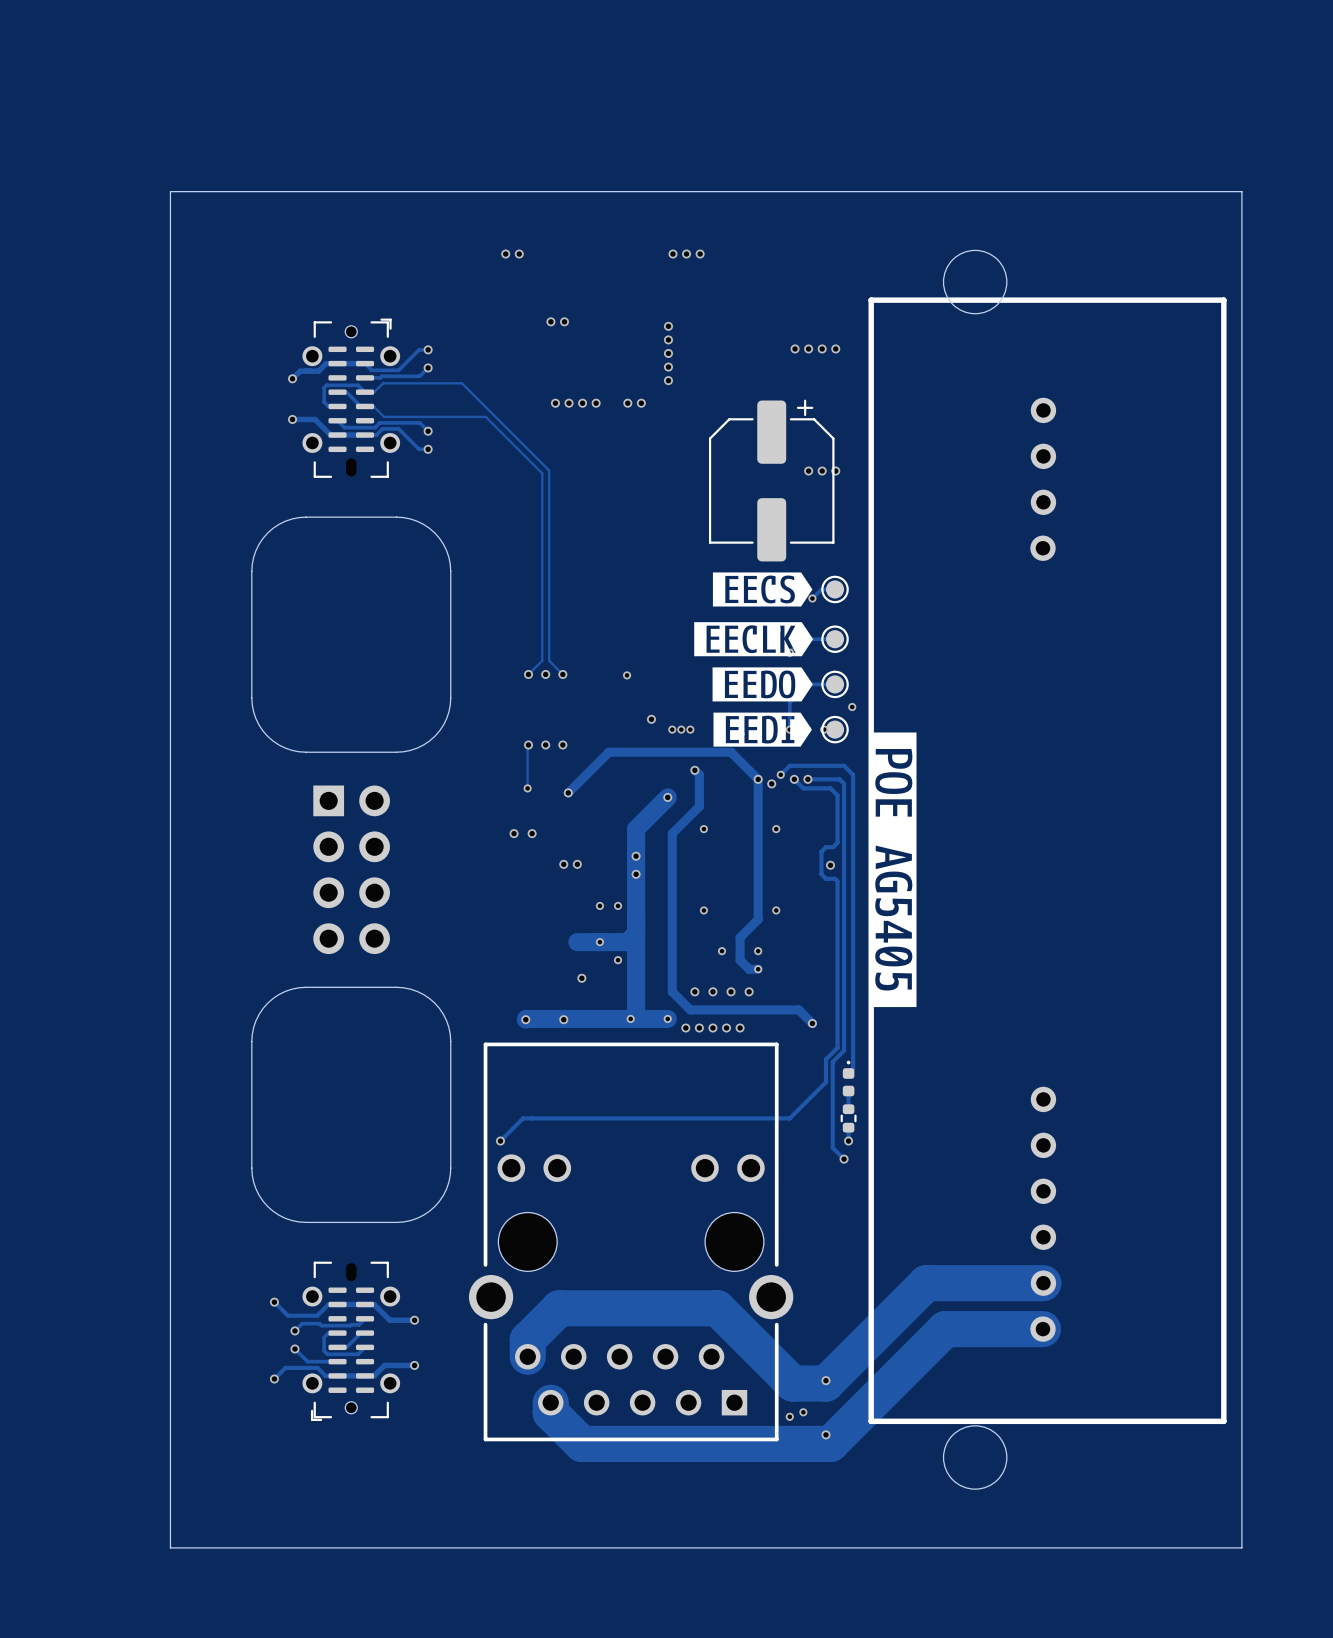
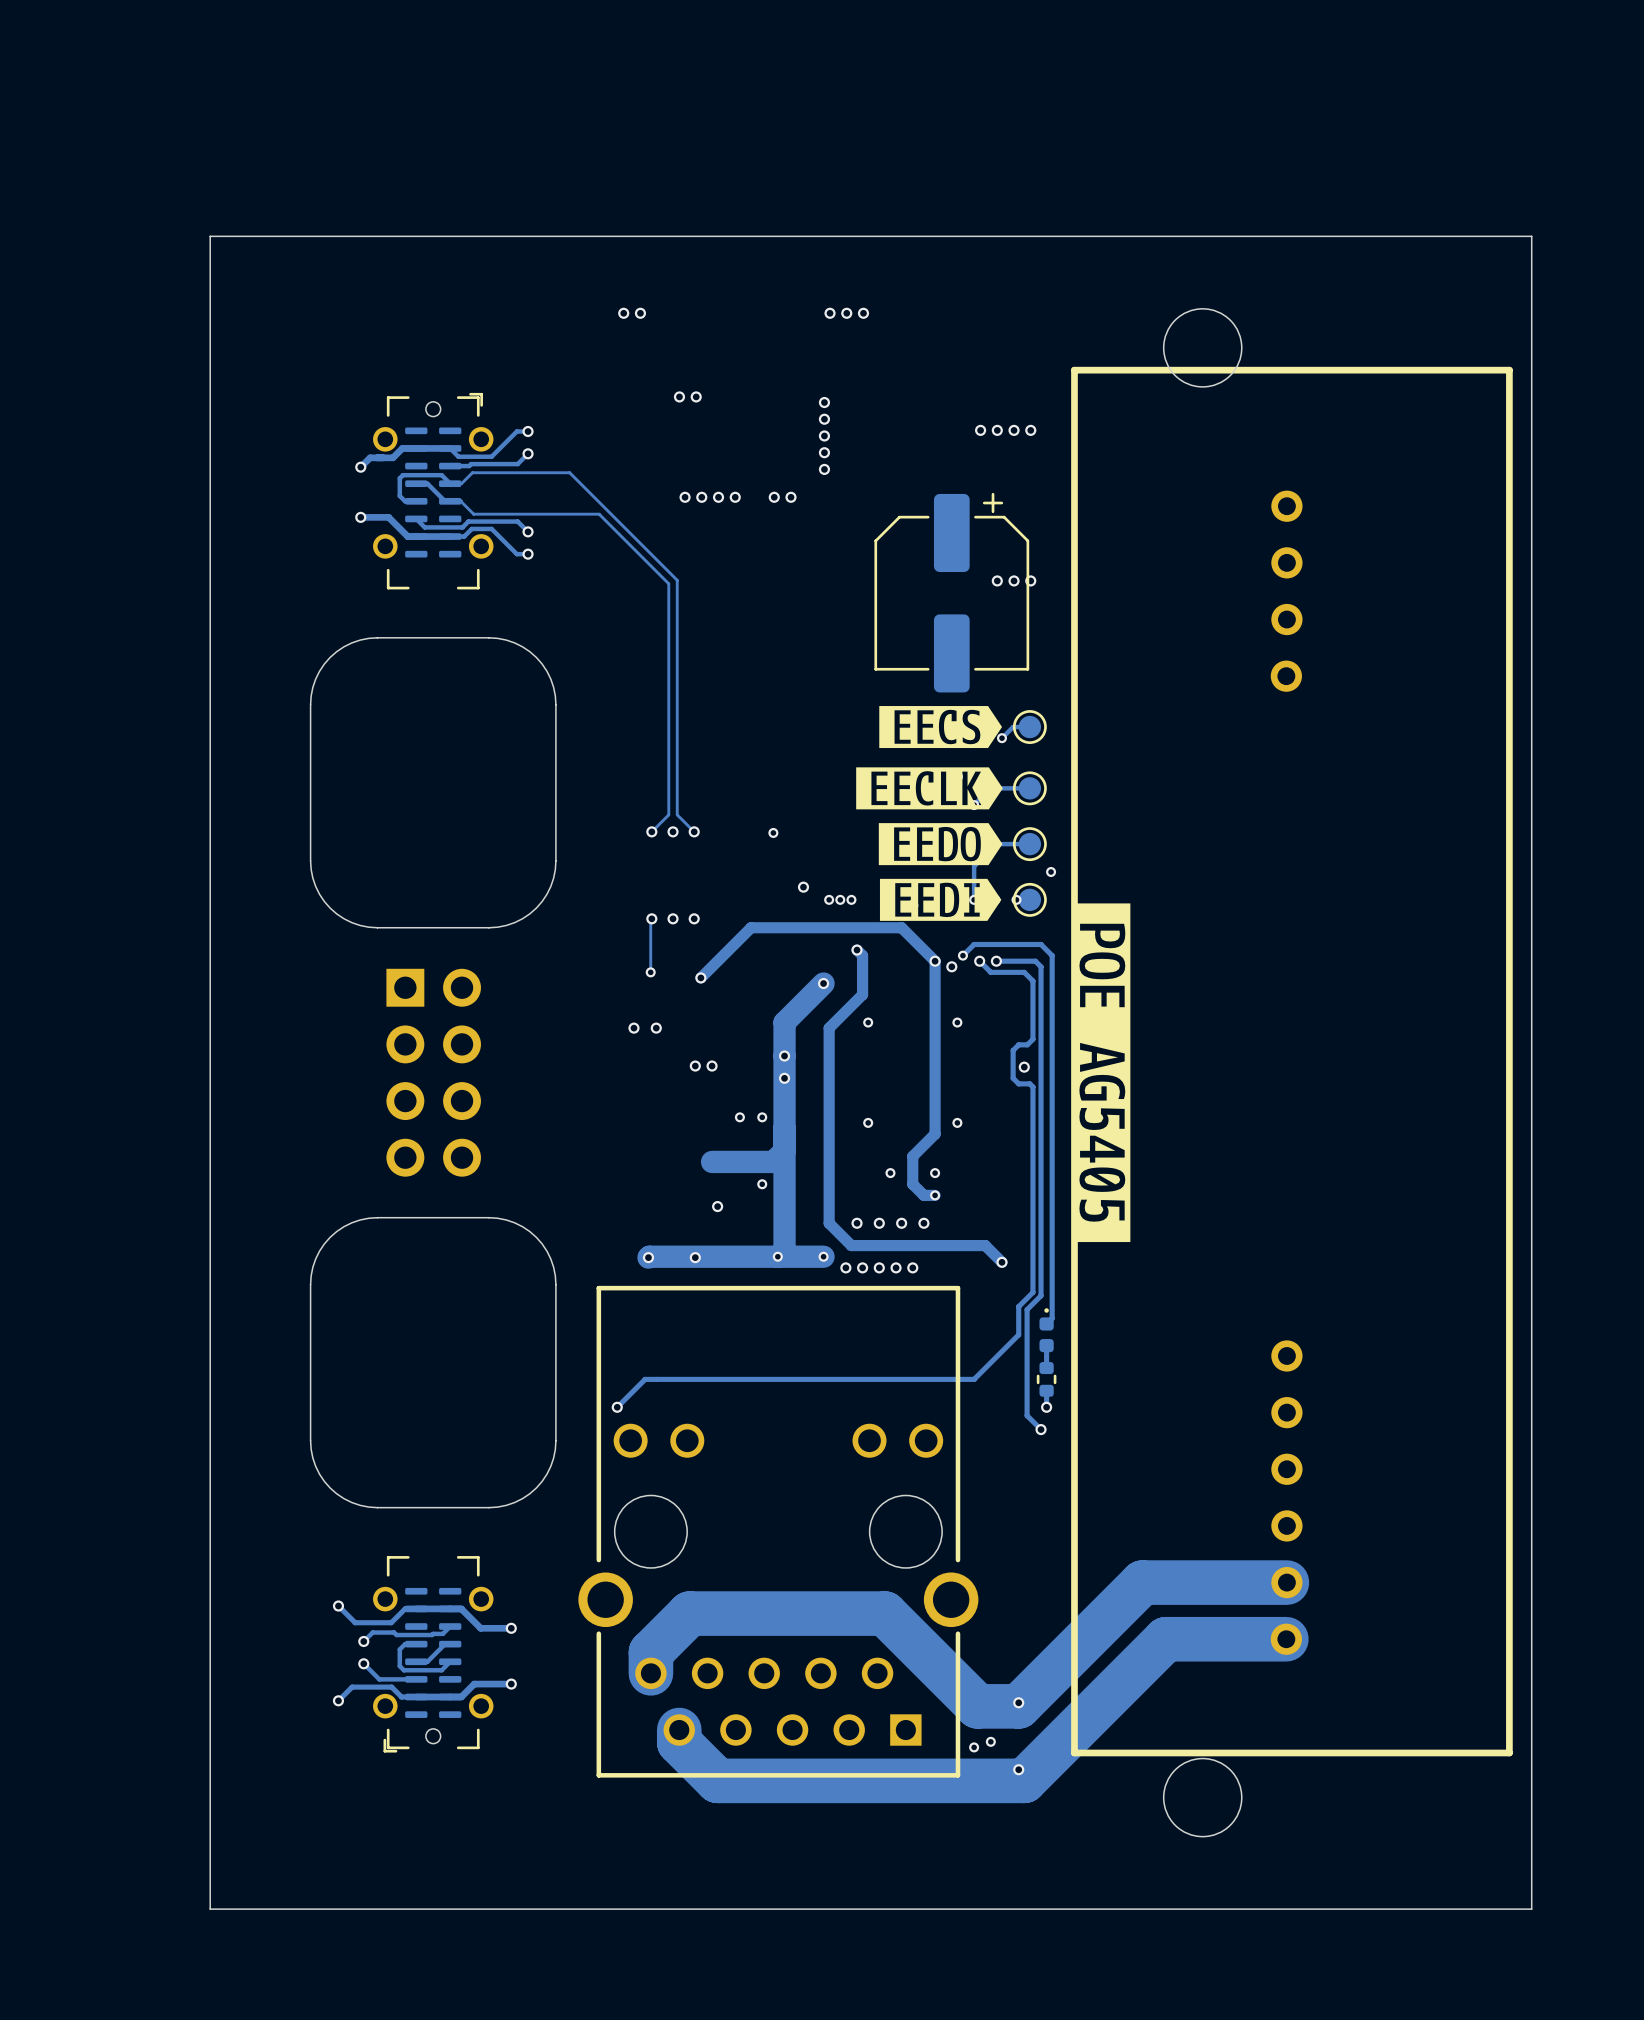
via: (599, 942) -> none

